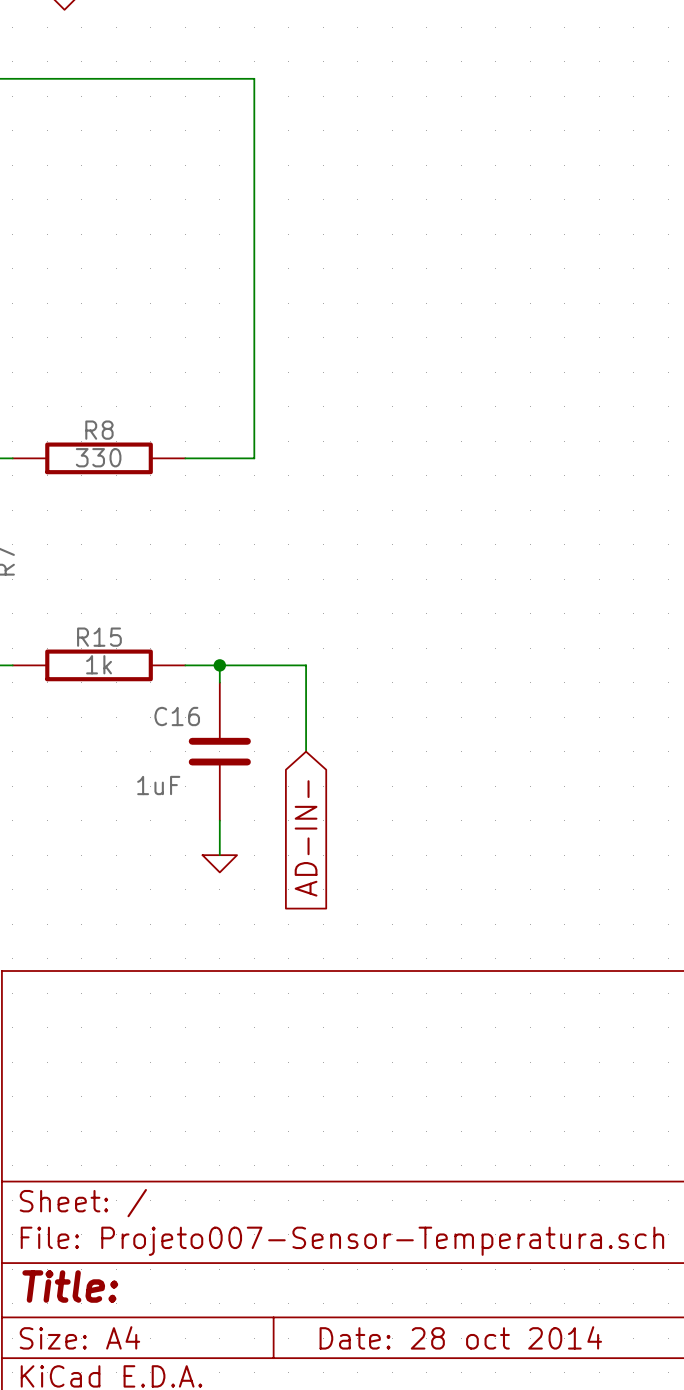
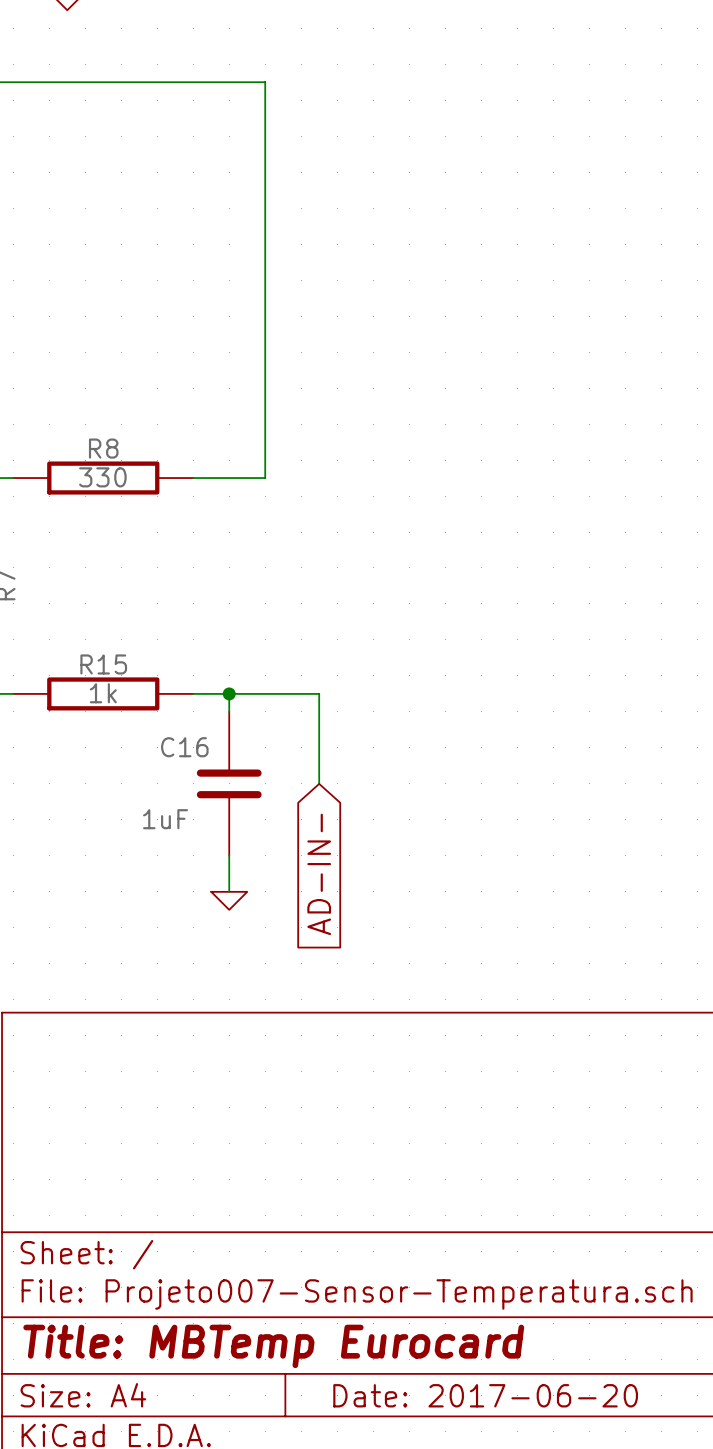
title block: Title: (70, 1286) -> Title: MBTemp Eurocard (273, 1346)
title block: Date: 28 oct 2014 (460, 1337) -> Date: 2017-06-20 (485, 1395)

